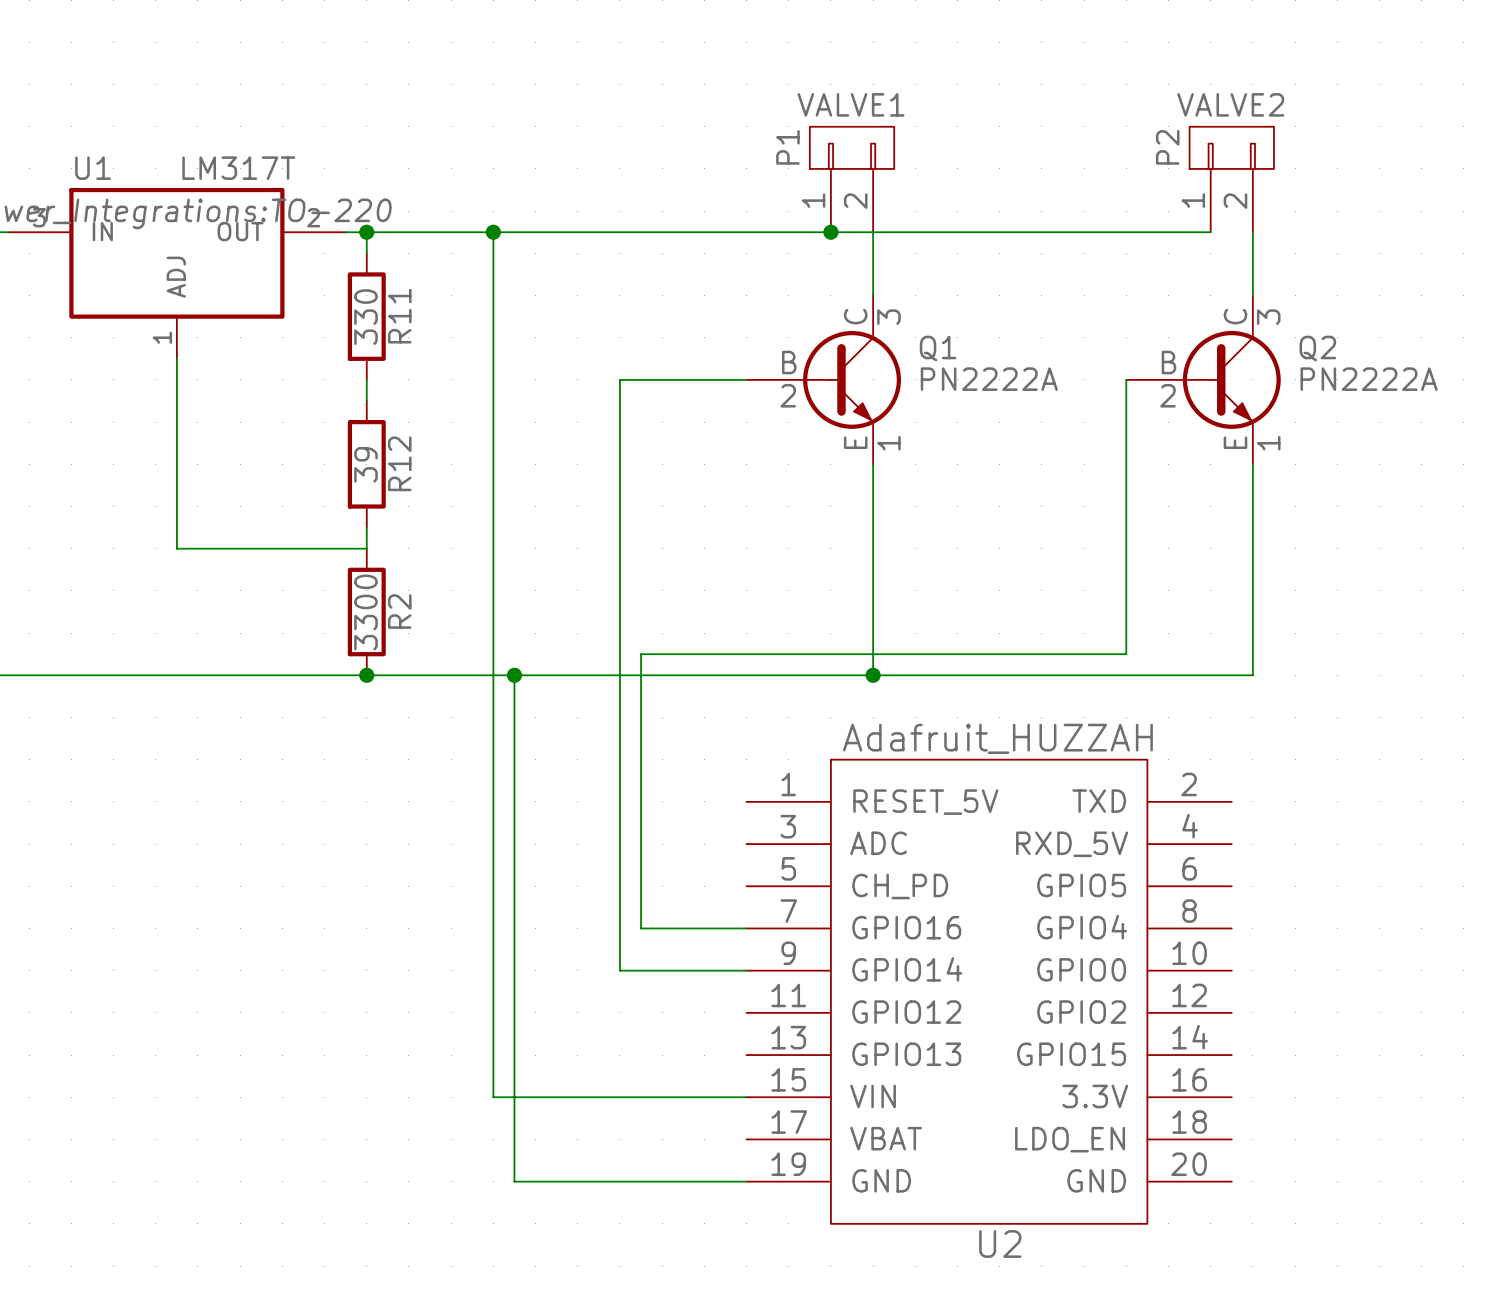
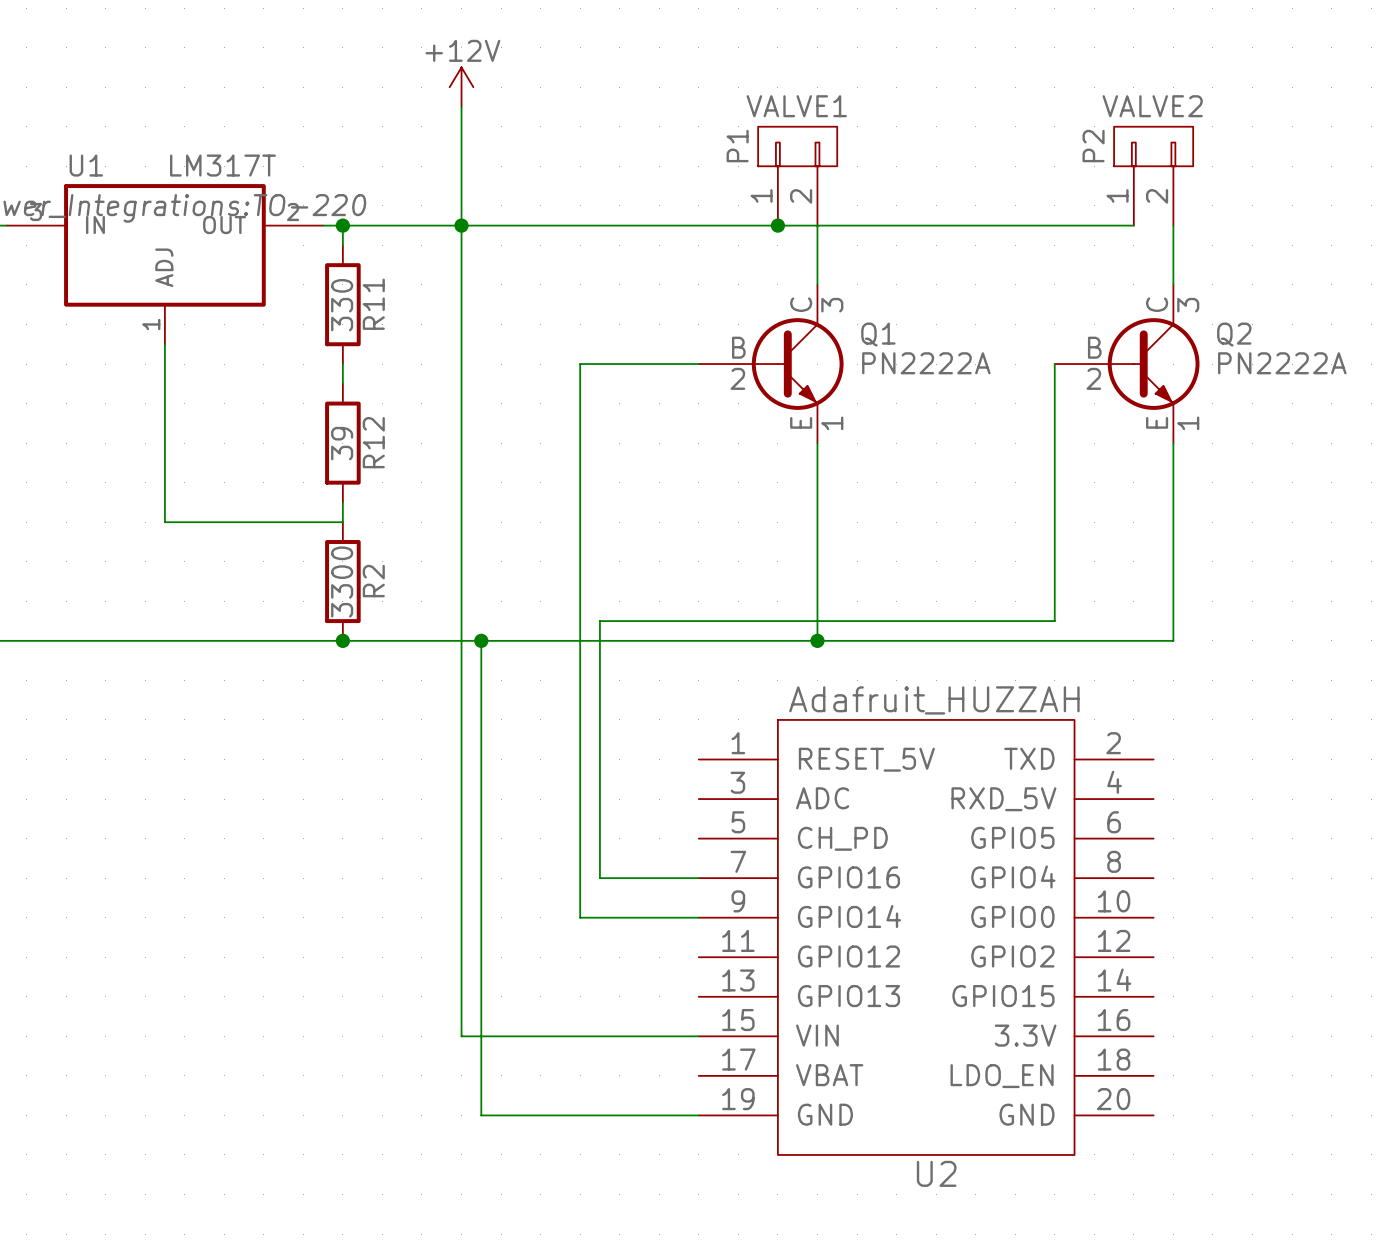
power symbol: none -> +12V (461, 87)
wire: none -> (461, 106) (461, 225)

